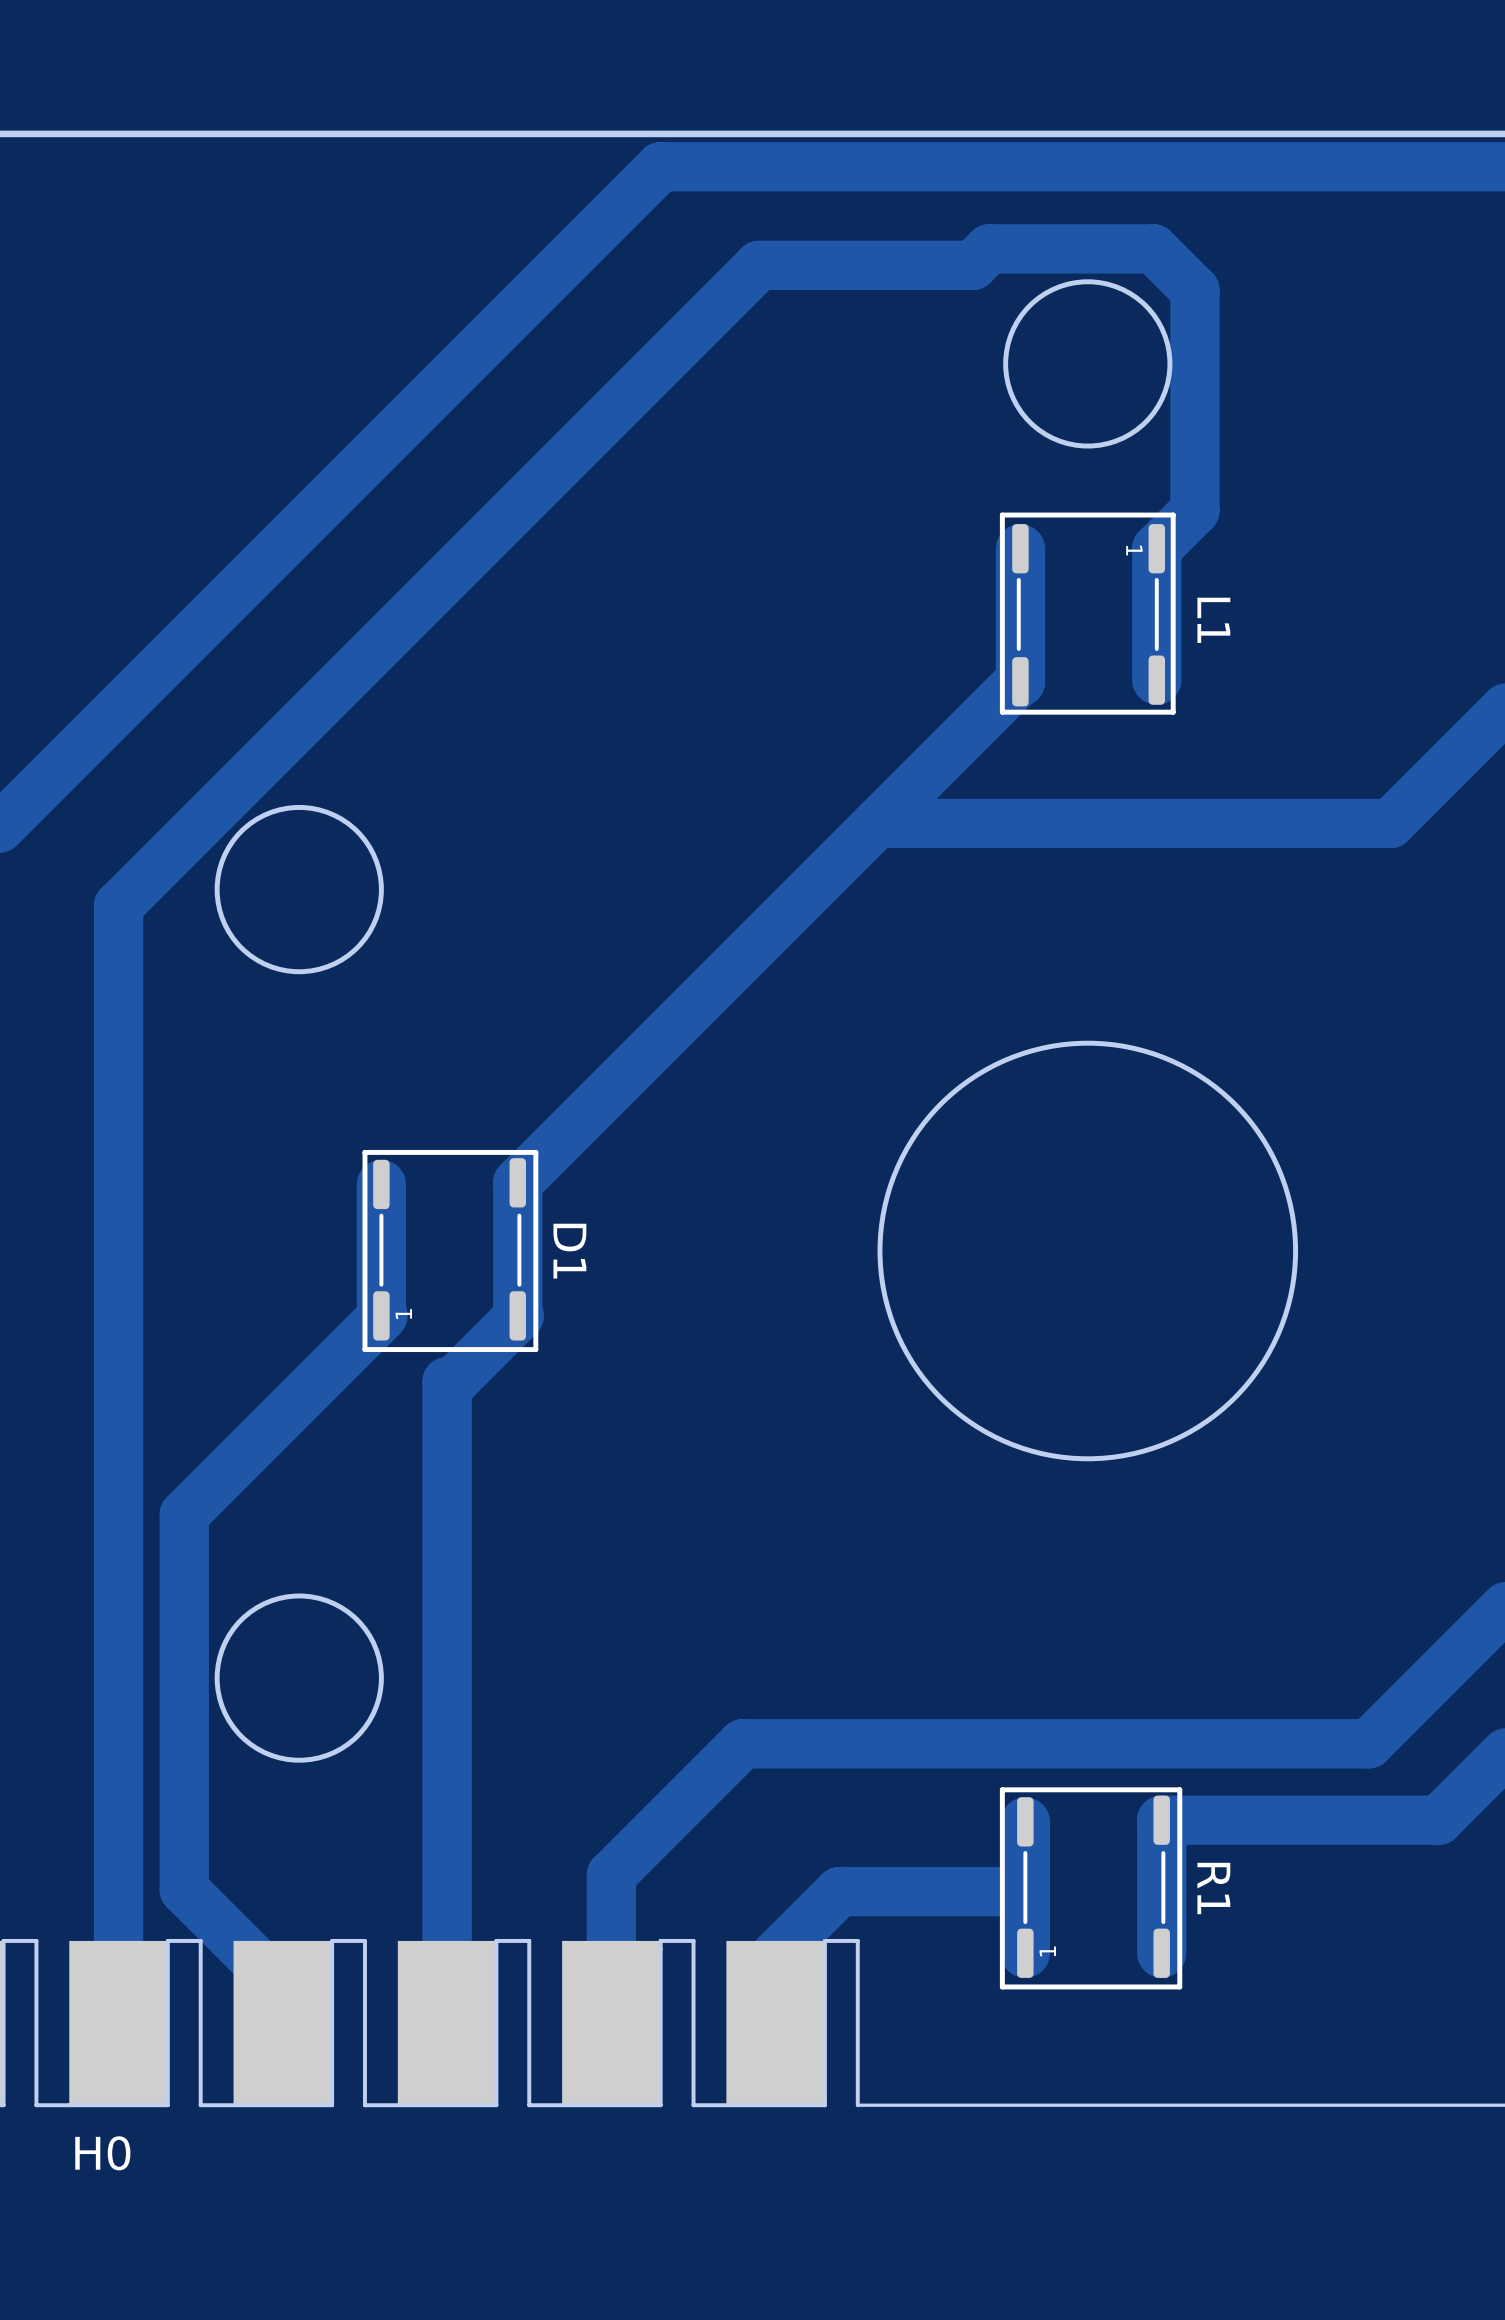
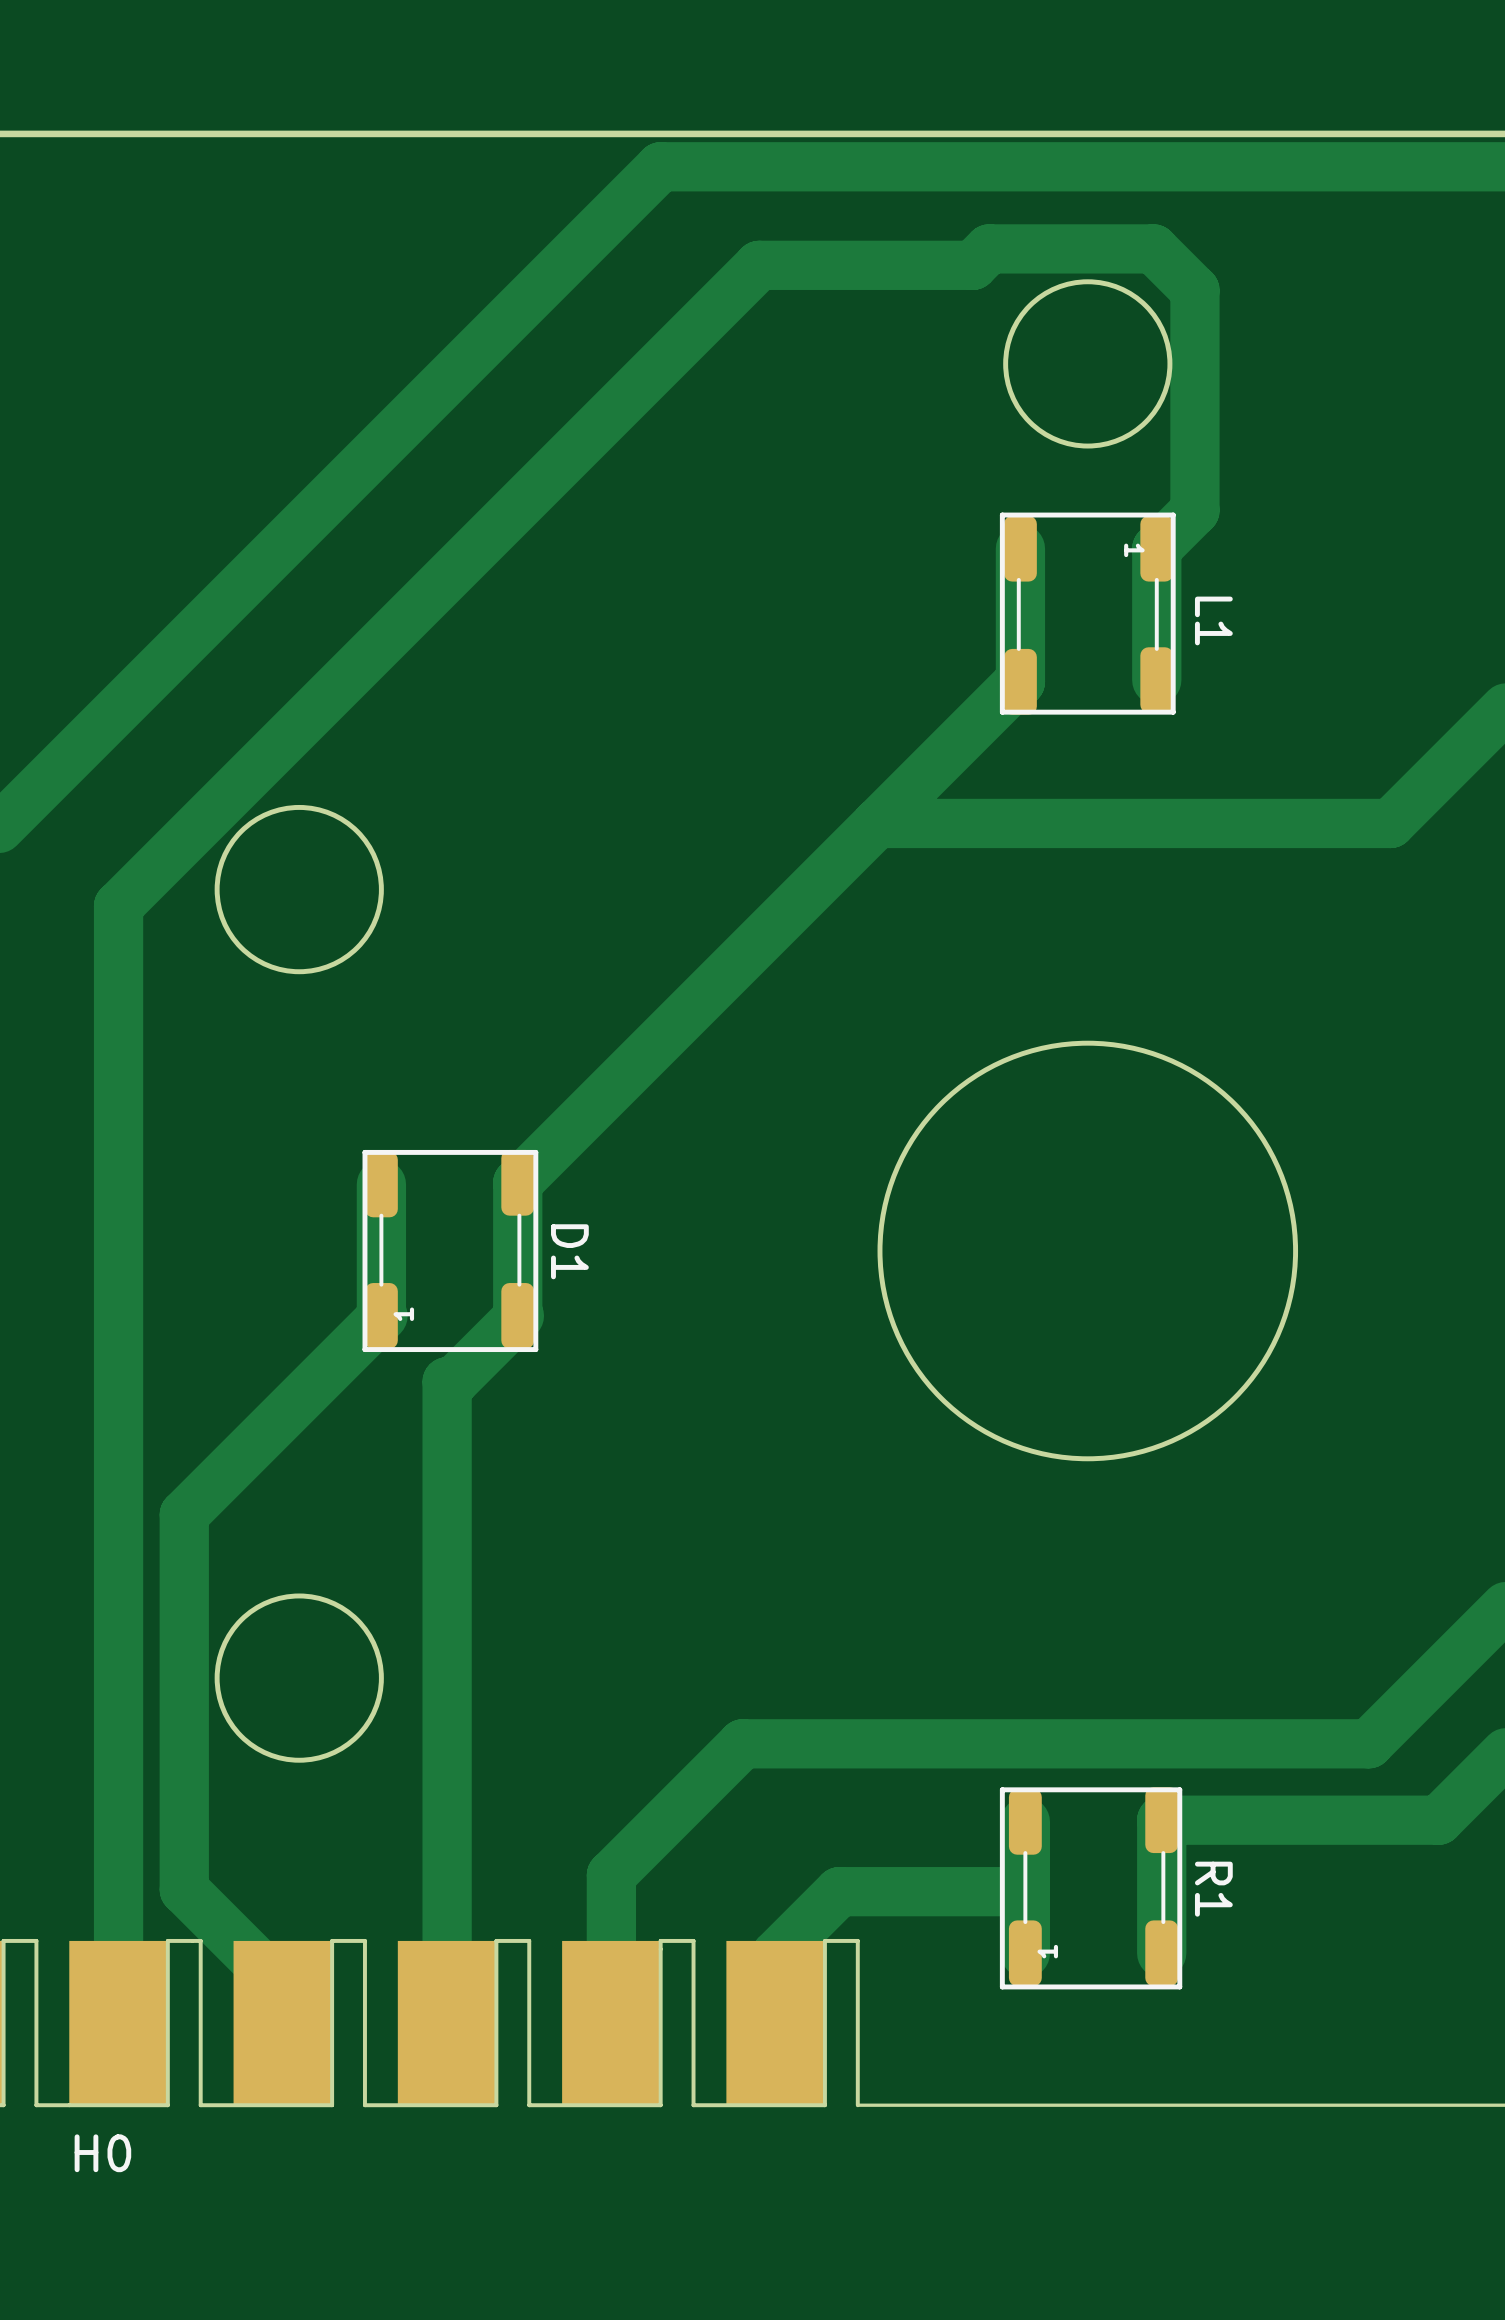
L1 footprint: [1012, 524, 1165, 707] -> [1004, 515, 1174, 715]
D1 footprint: [373, 1158, 526, 1341] -> [364, 1149, 535, 1349]
R1 footprint: [1017, 1795, 1170, 1978] -> [1008, 1787, 1179, 1987]

